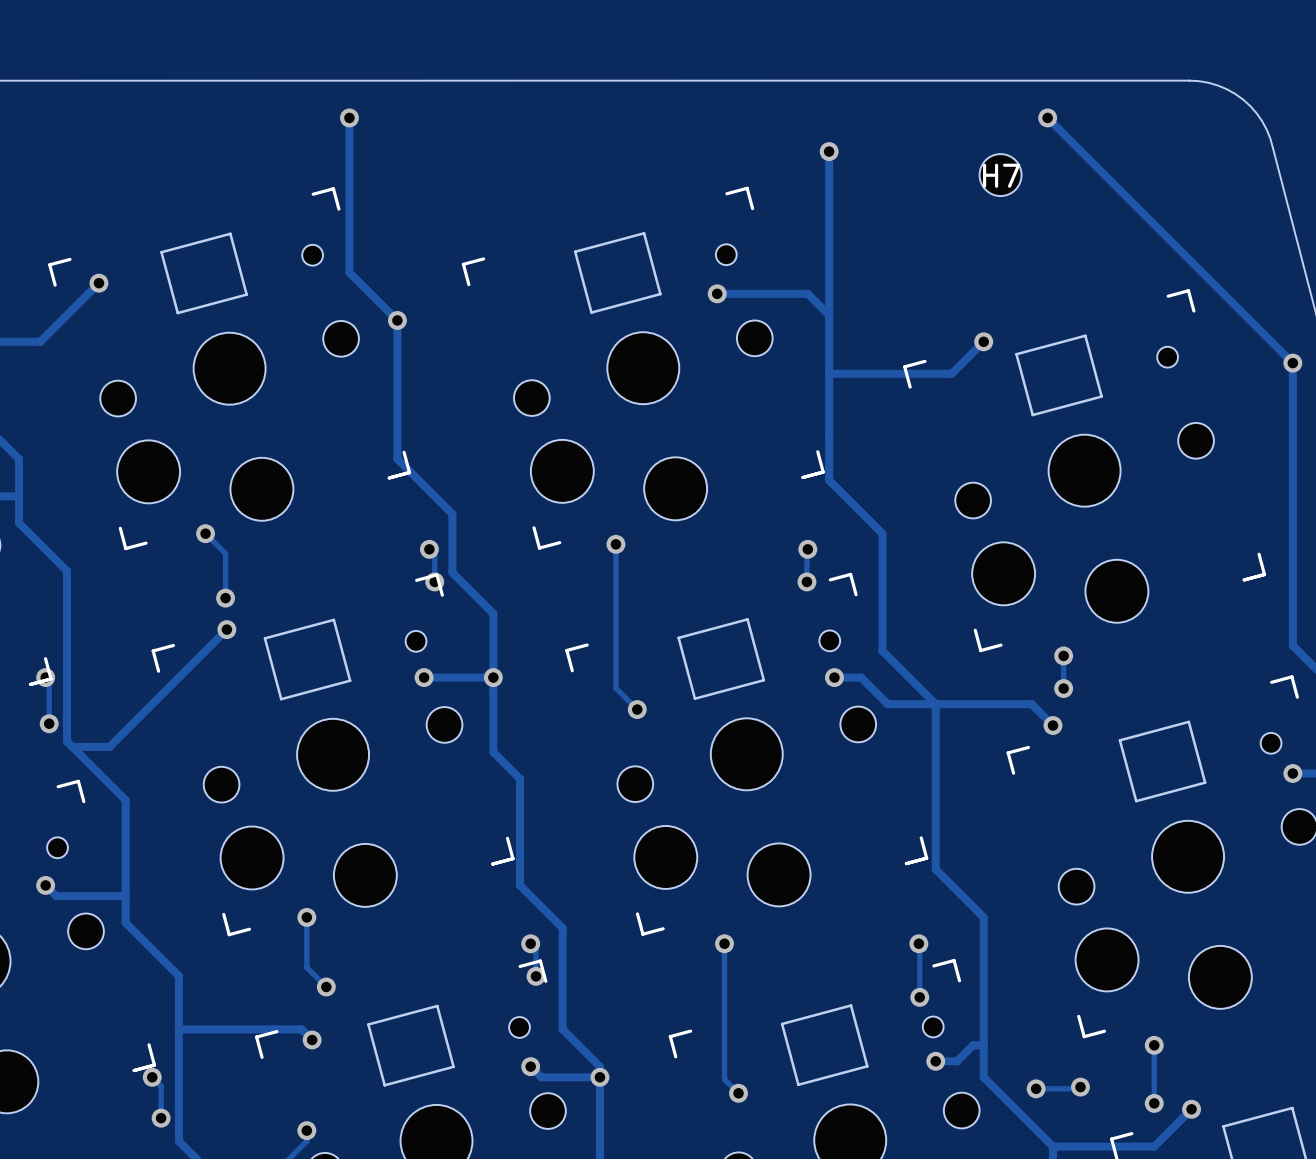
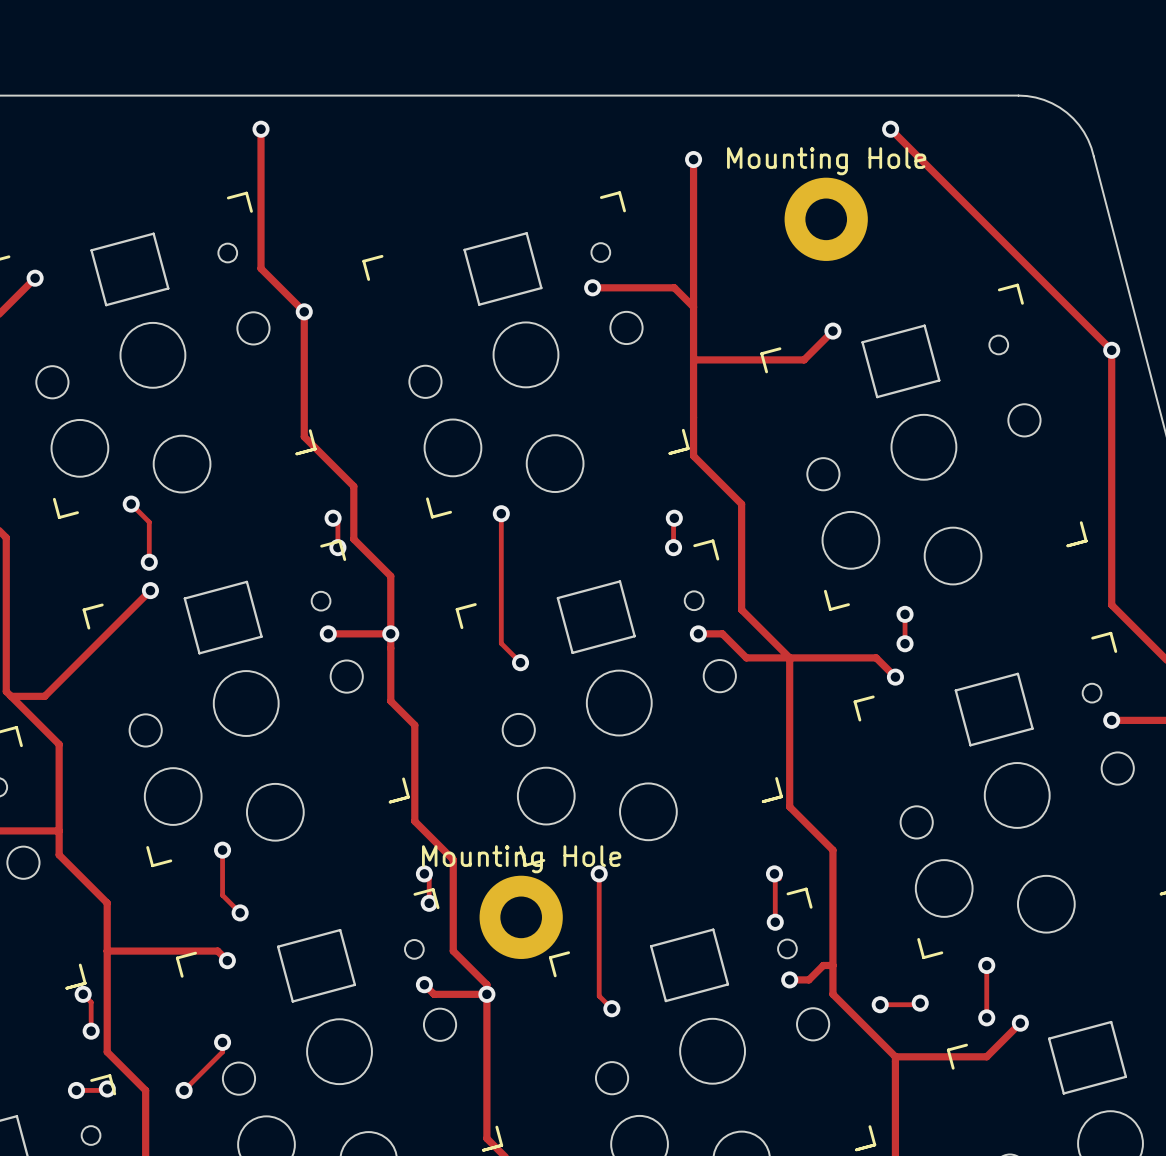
H7: (1000, 175) -> none
Mounting Hole: none -> (826, 219)
Mounting Hole: none -> (521, 917)

